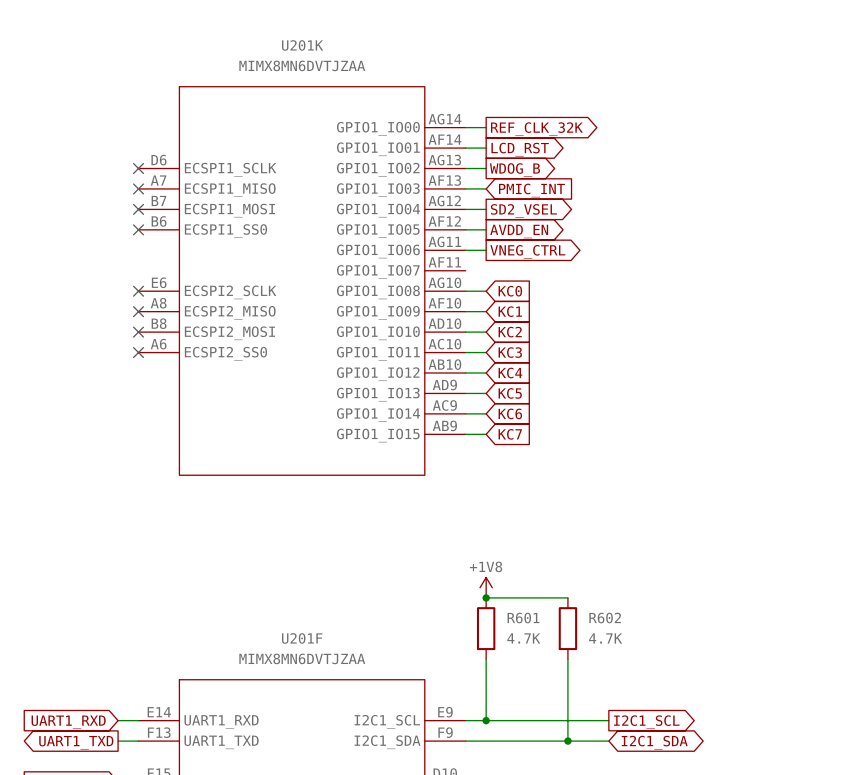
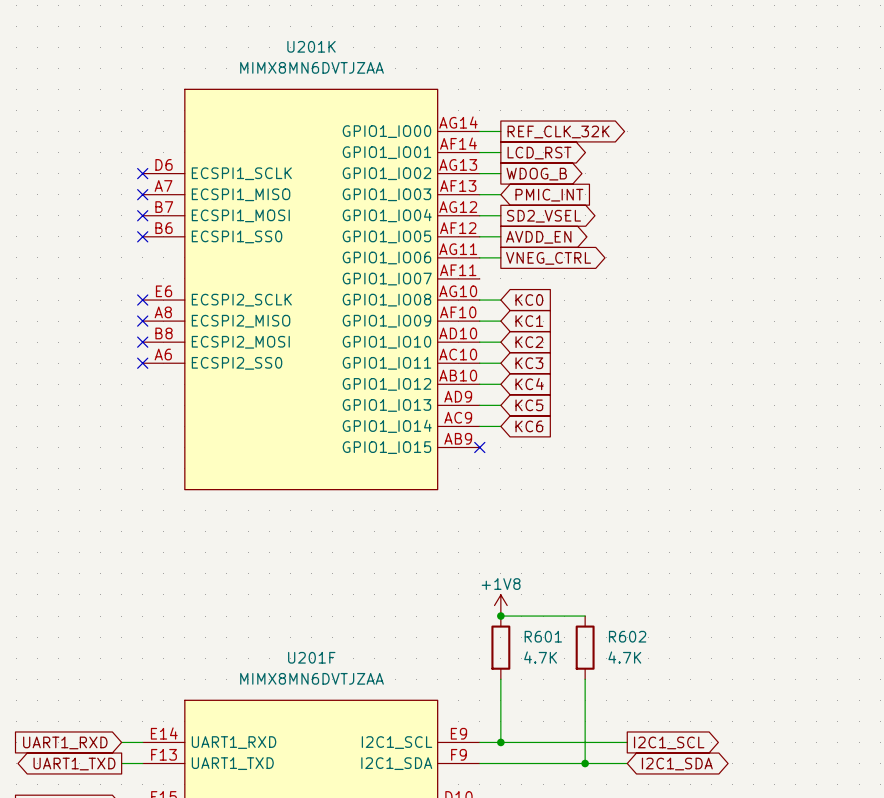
wire: (465, 434) (486, 434) -> none
no-connect mark: none -> (479, 447)
global label: KC7 (510, 434) -> none

